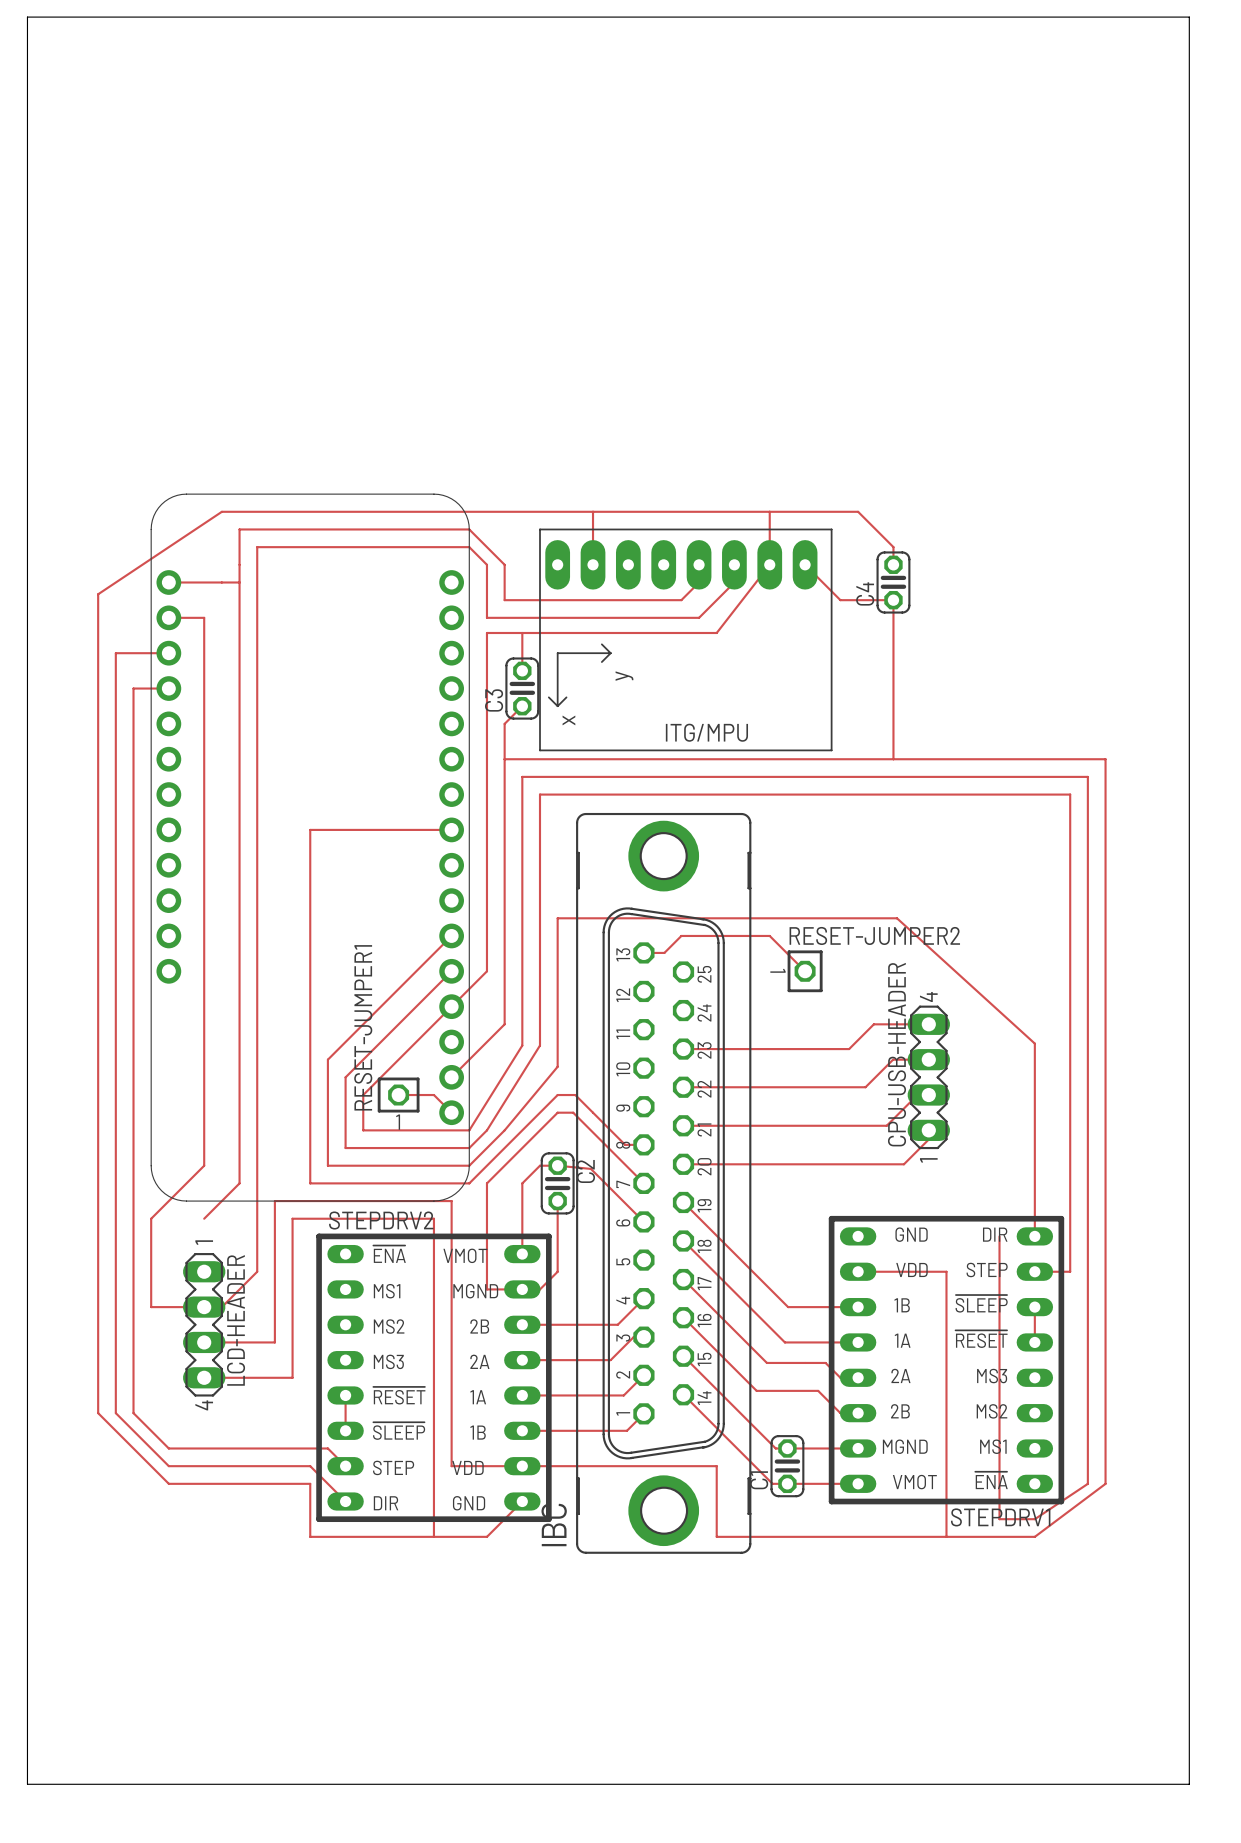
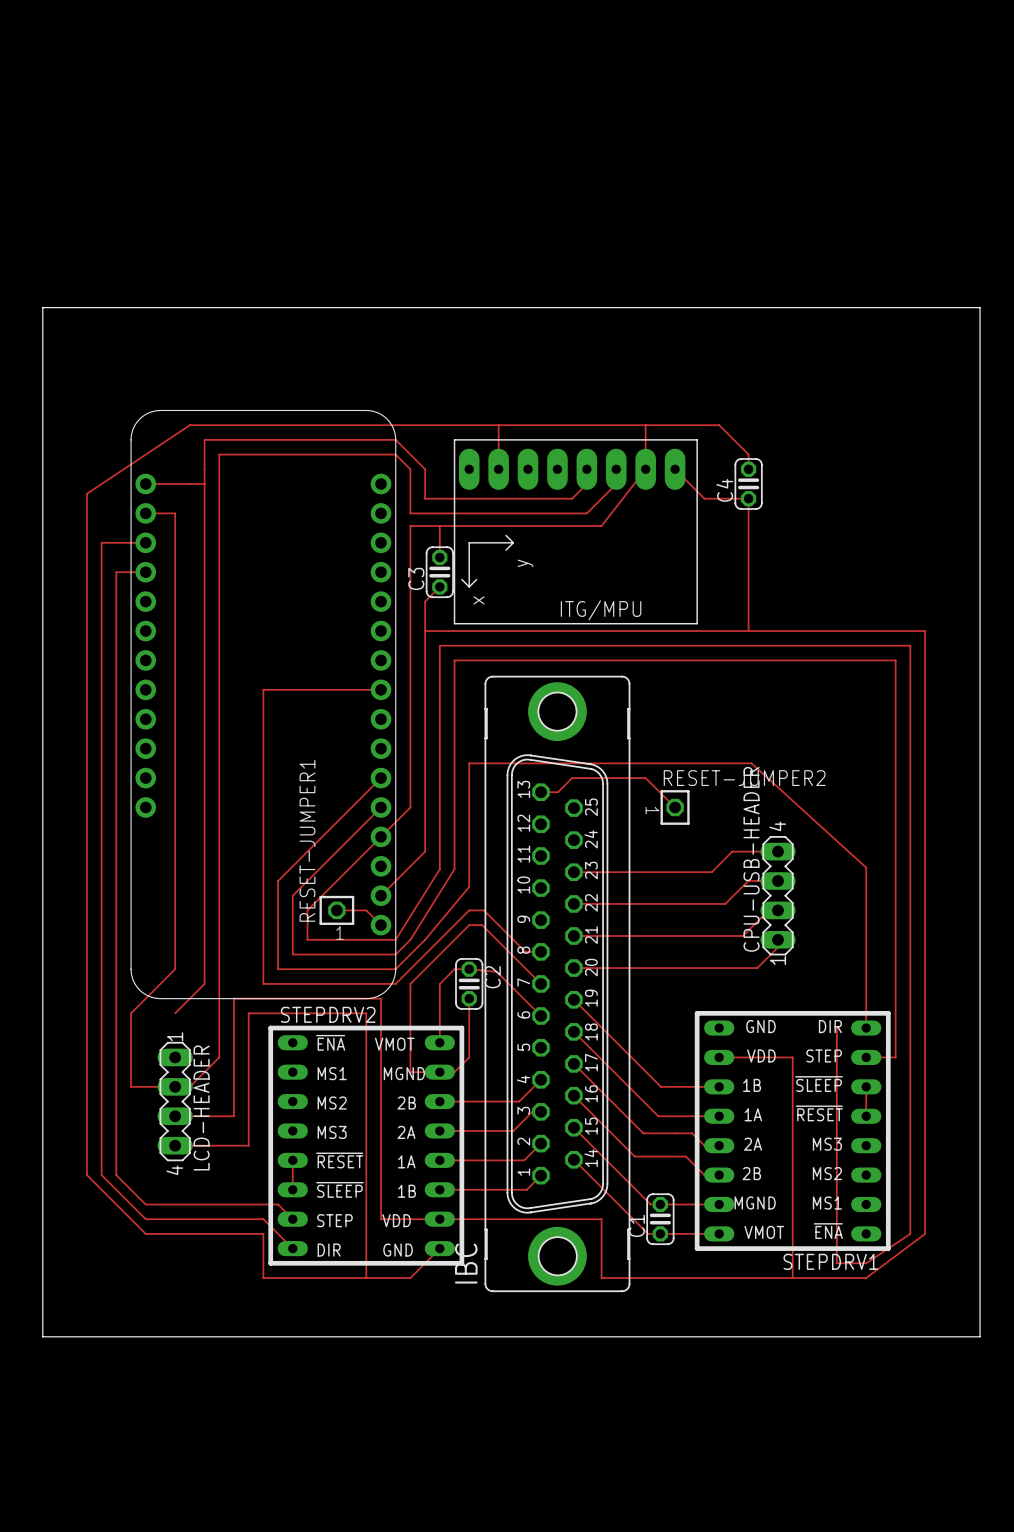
board edge: (27, 17) (1189, 17) (1189, 1784) (27, 1784) (27, 17) -> (42, 307) (42, 1336) (980, 1336) (980, 307) (42, 307)

